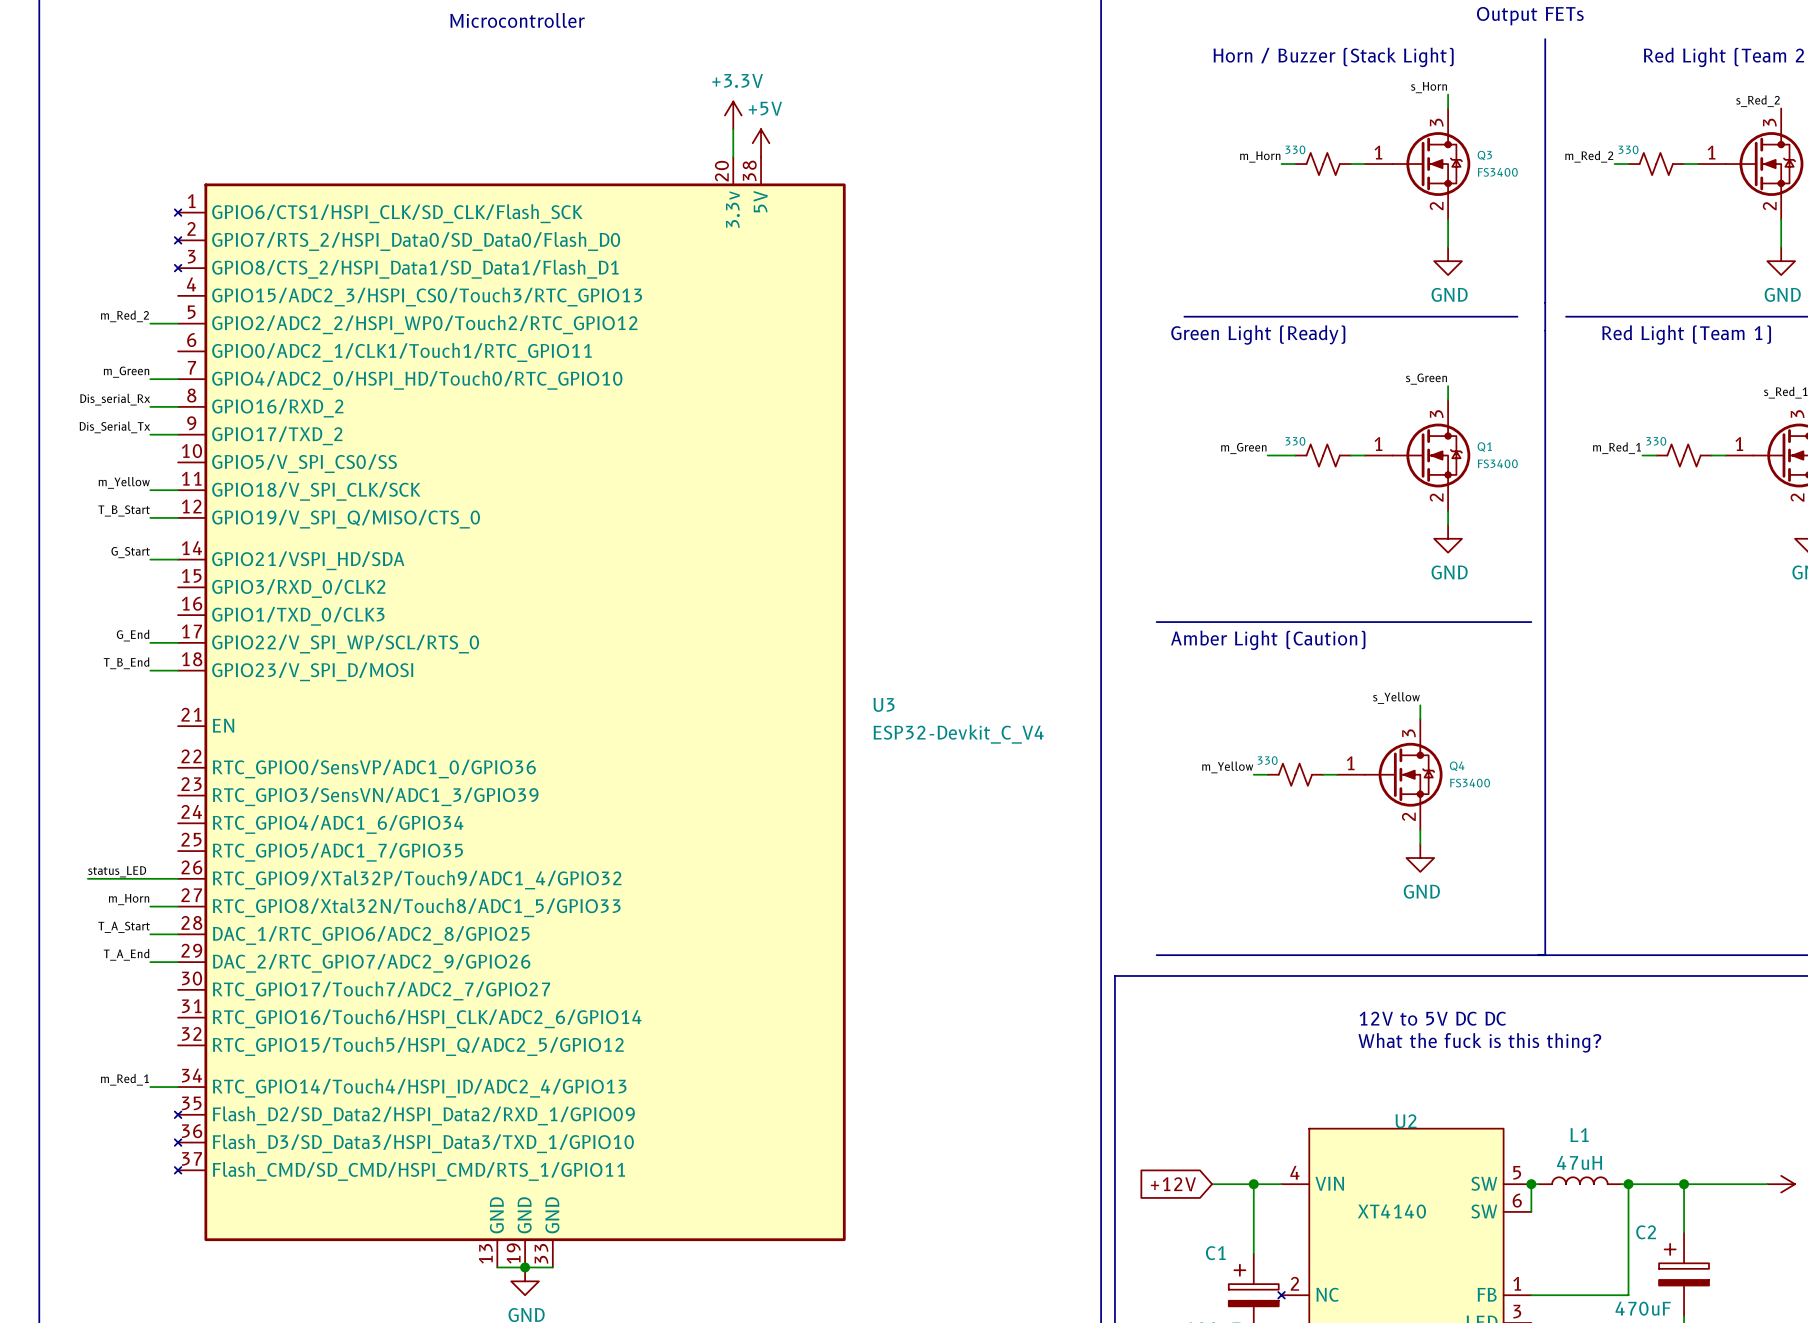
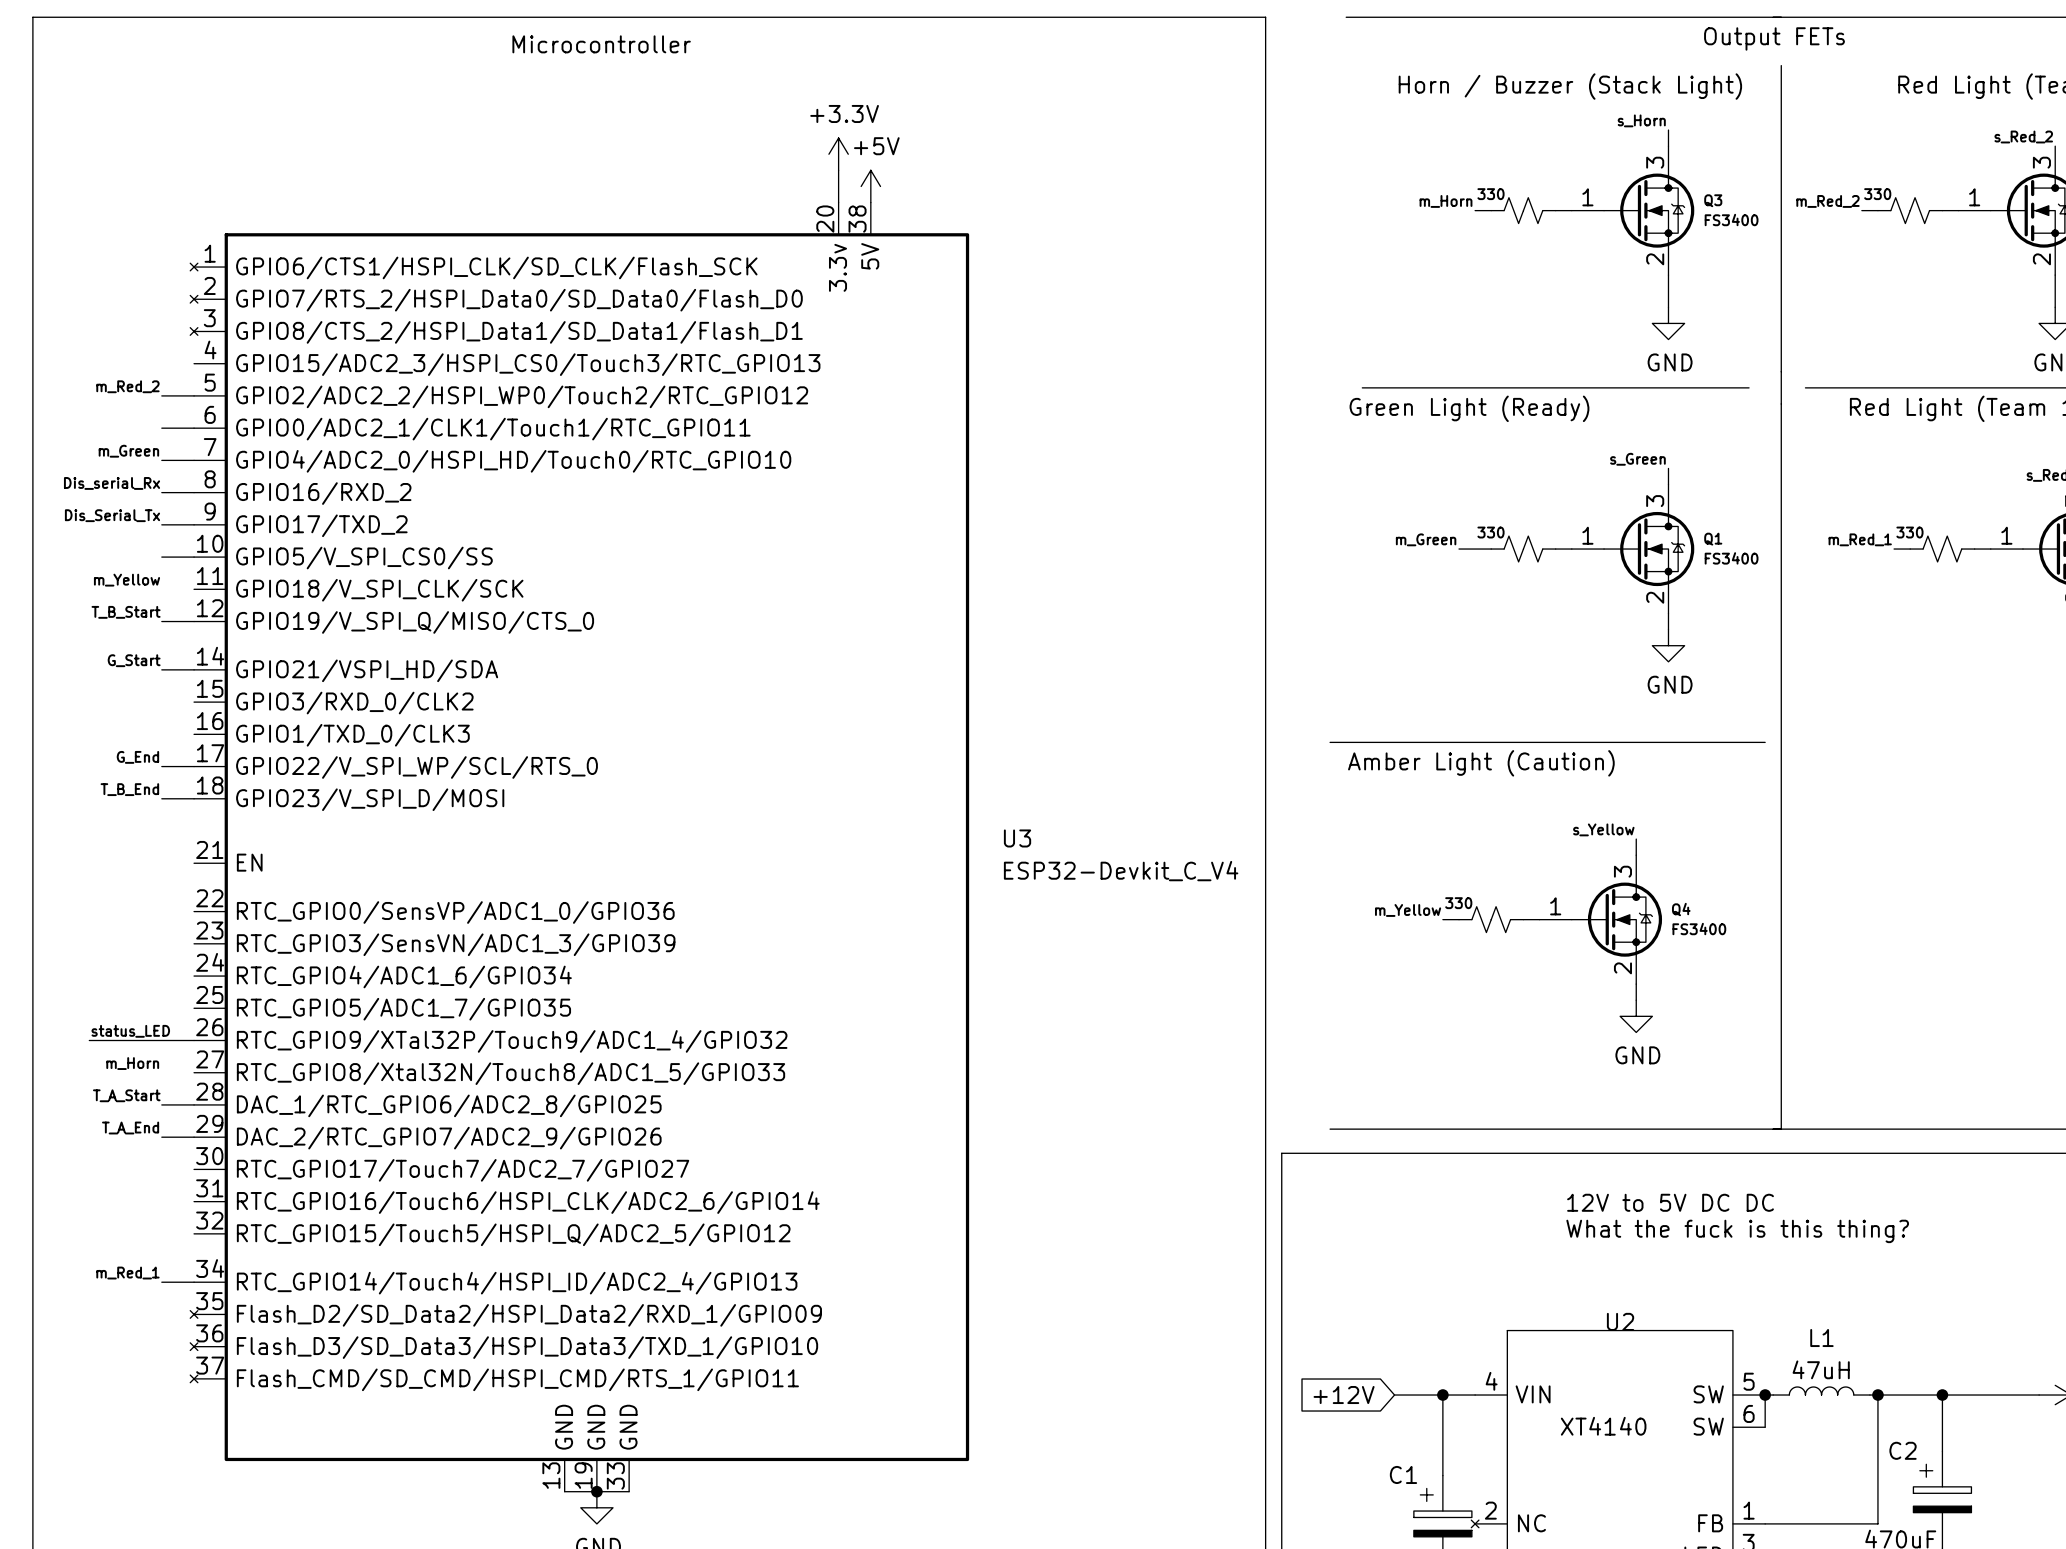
wire: none -> (161, 428) (194, 428)
wire: (150, 490) (178, 490) -> (161, 557) (194, 557)
wire: (150, 906) (178, 906) -> none

